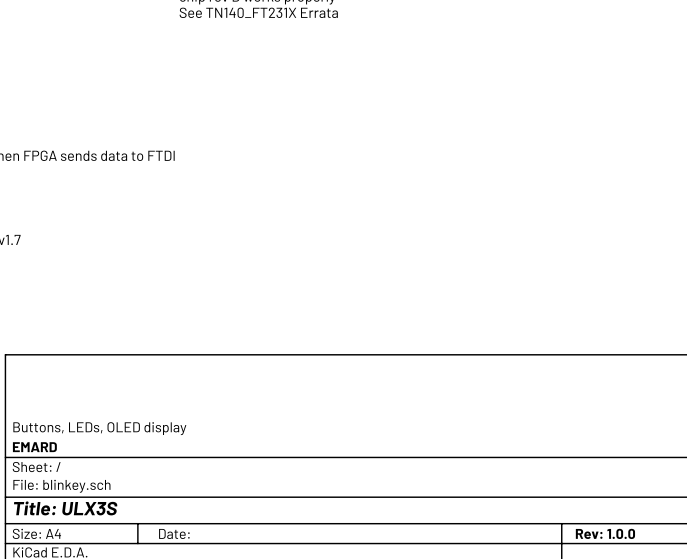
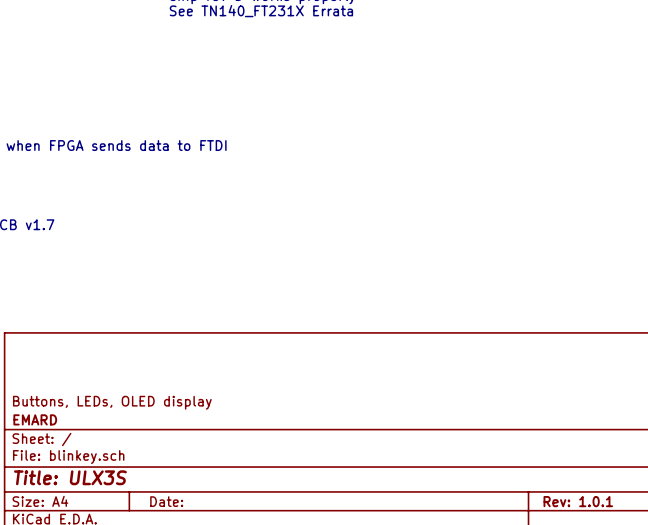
title block: Rev: 1.0.0 (605, 533) -> Rev: 1.0.1 (578, 501)

